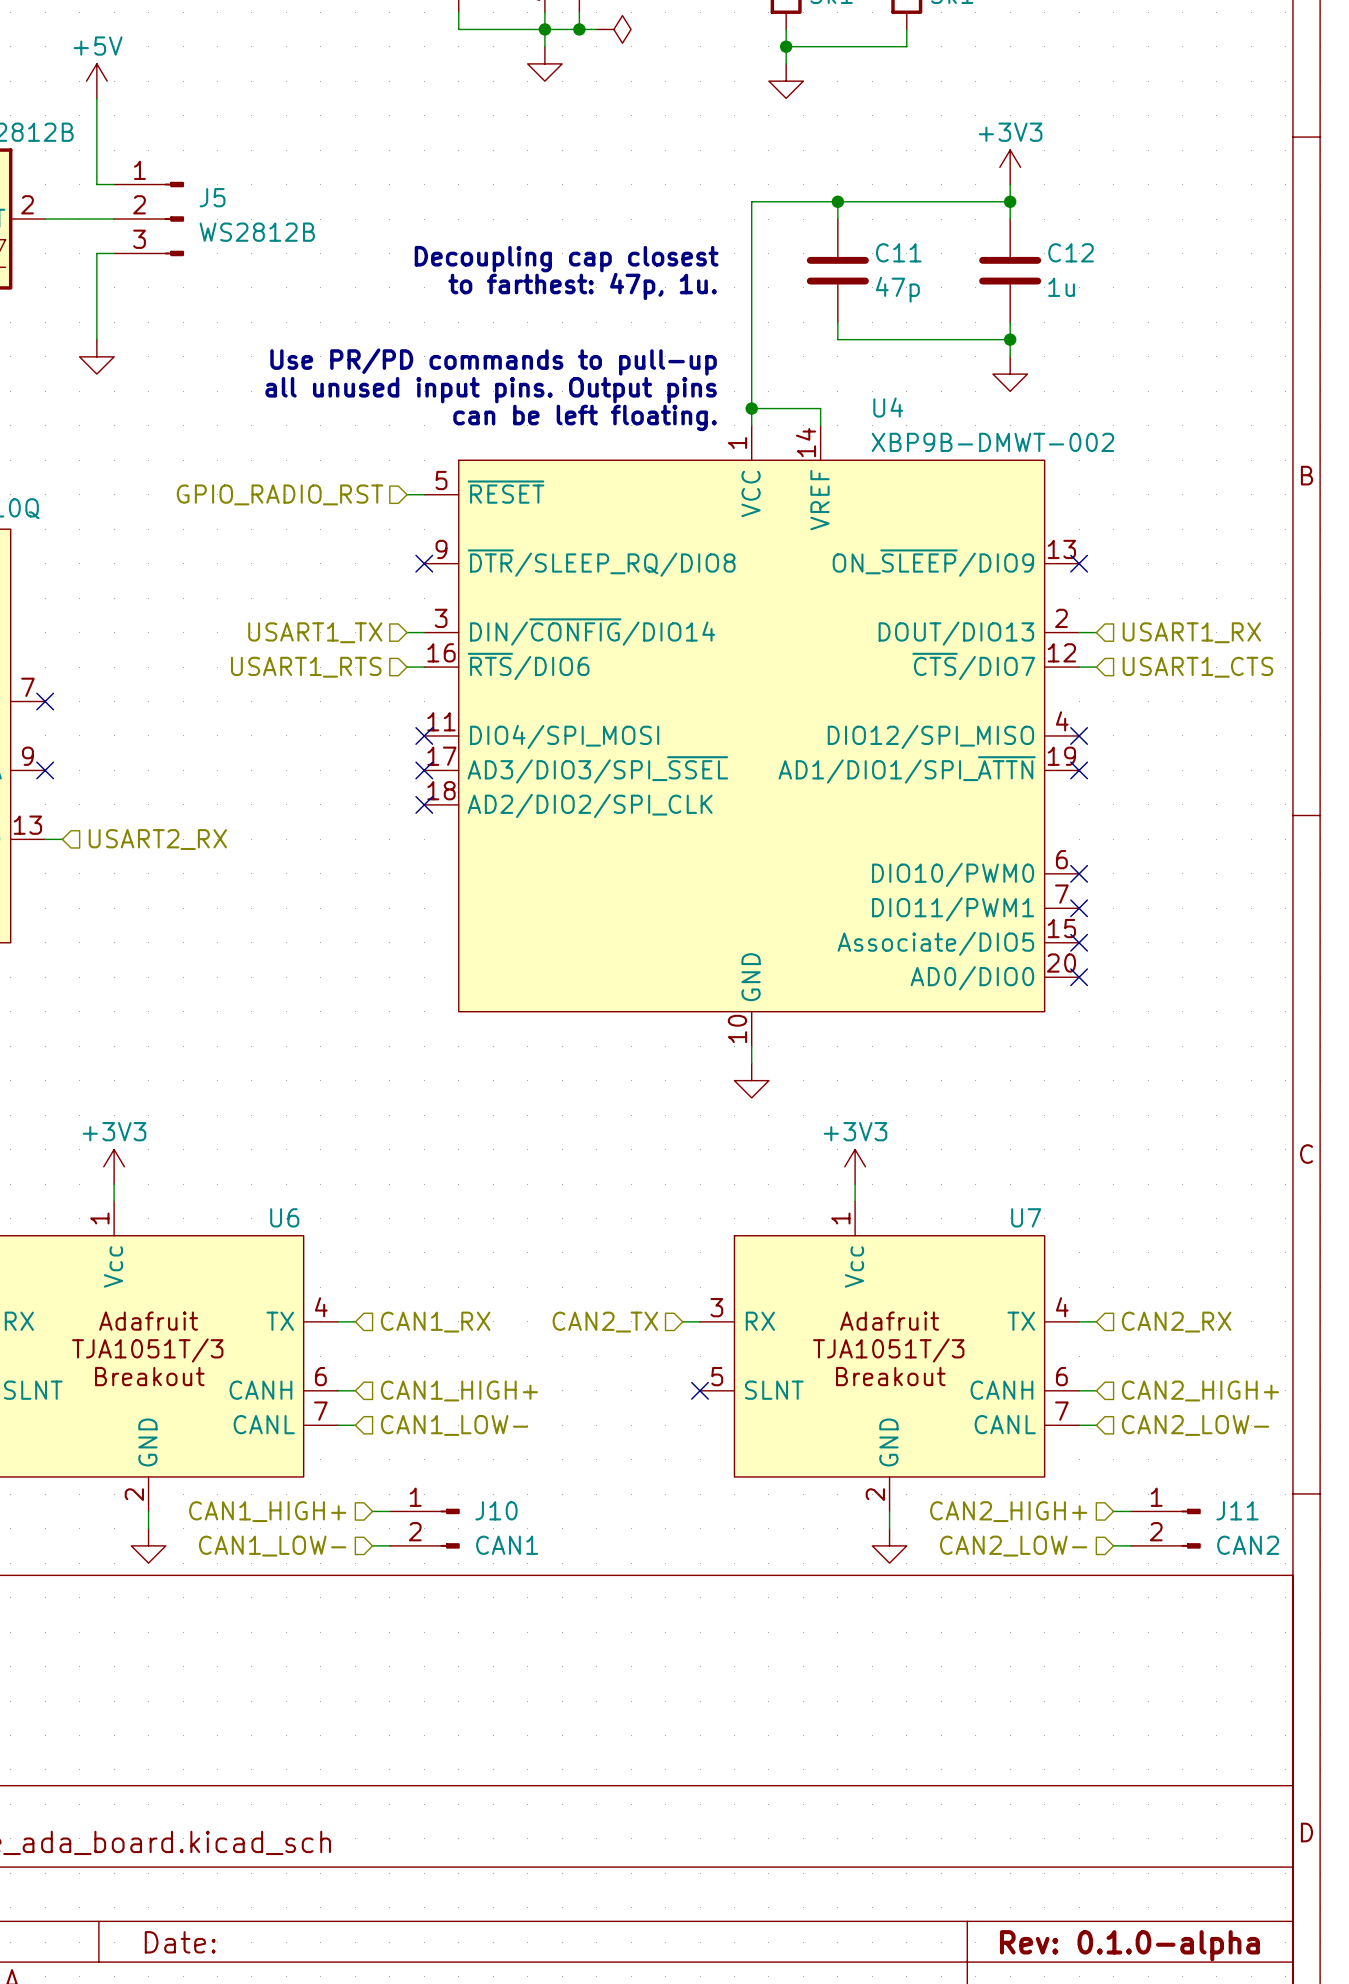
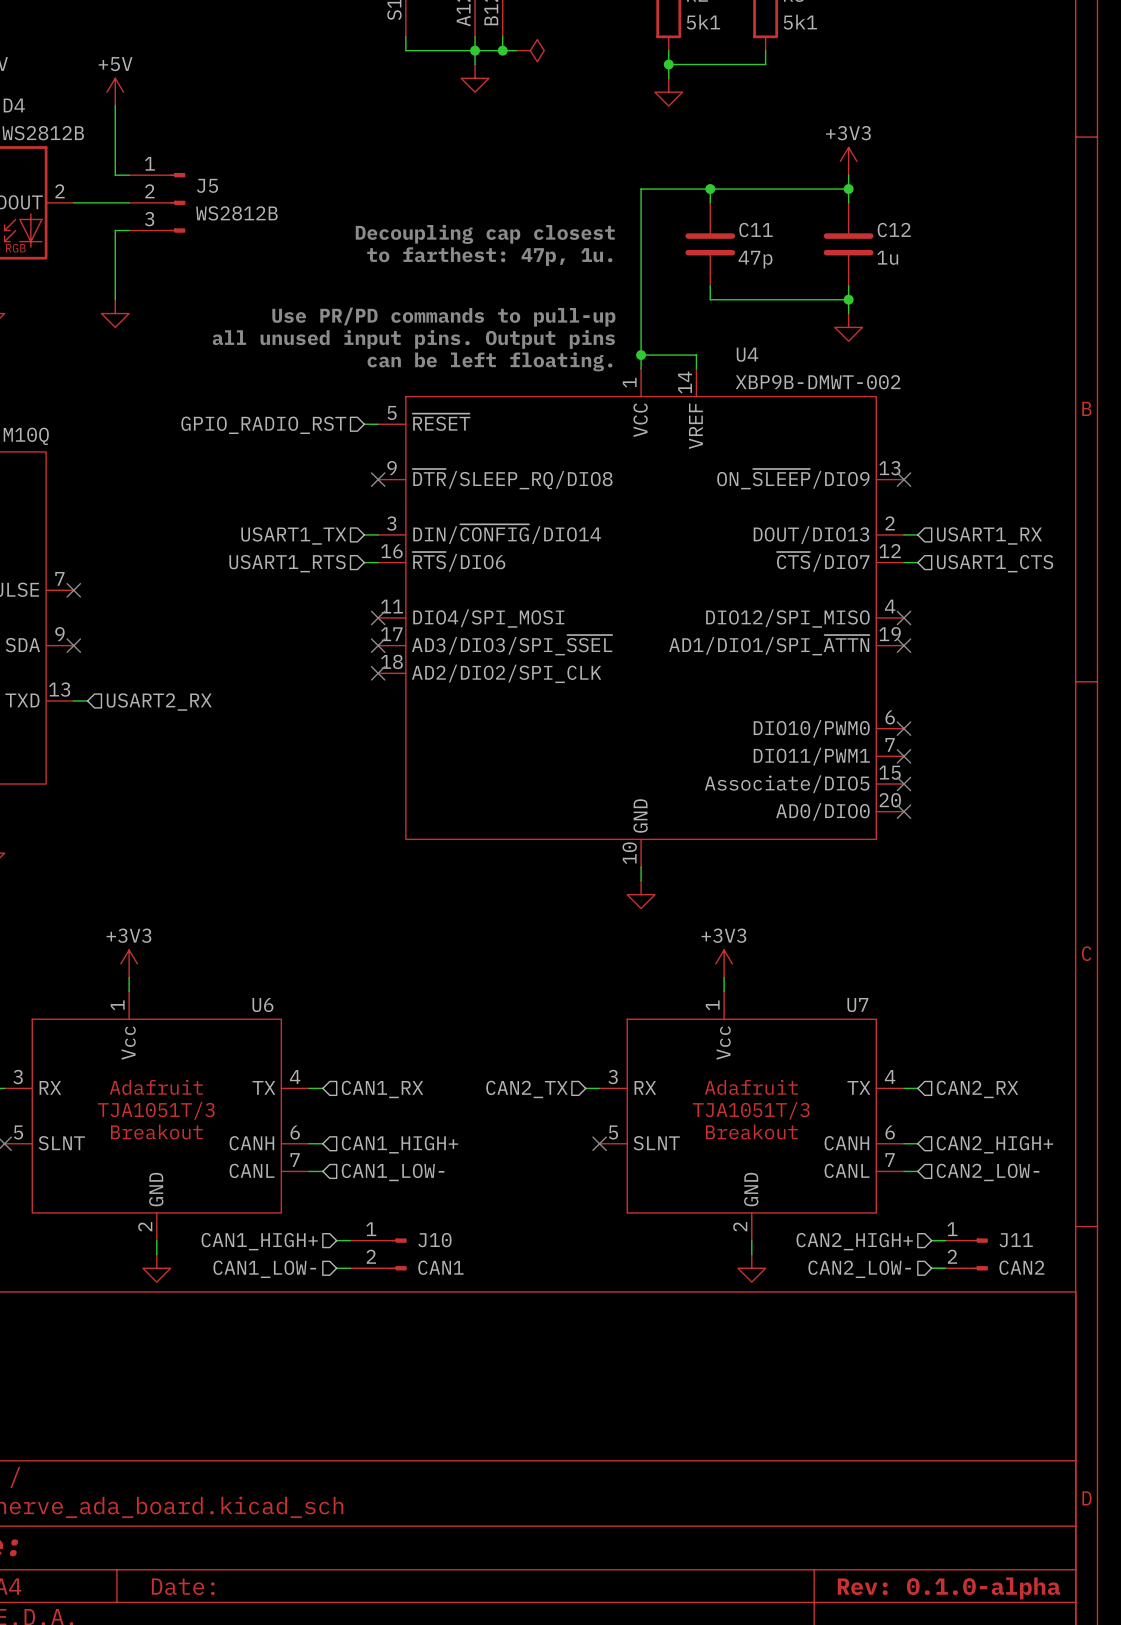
J11 position: (1165, 1528) -> (959, 1254)

